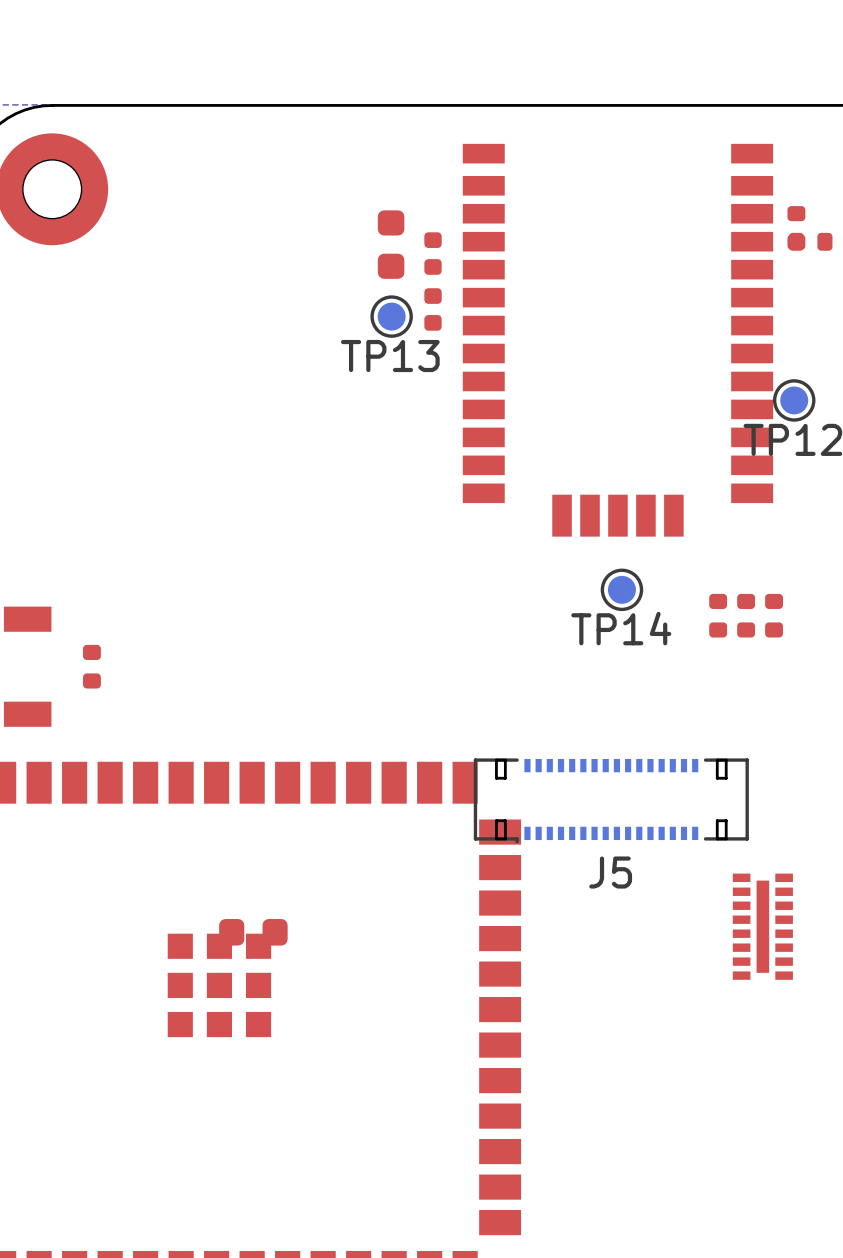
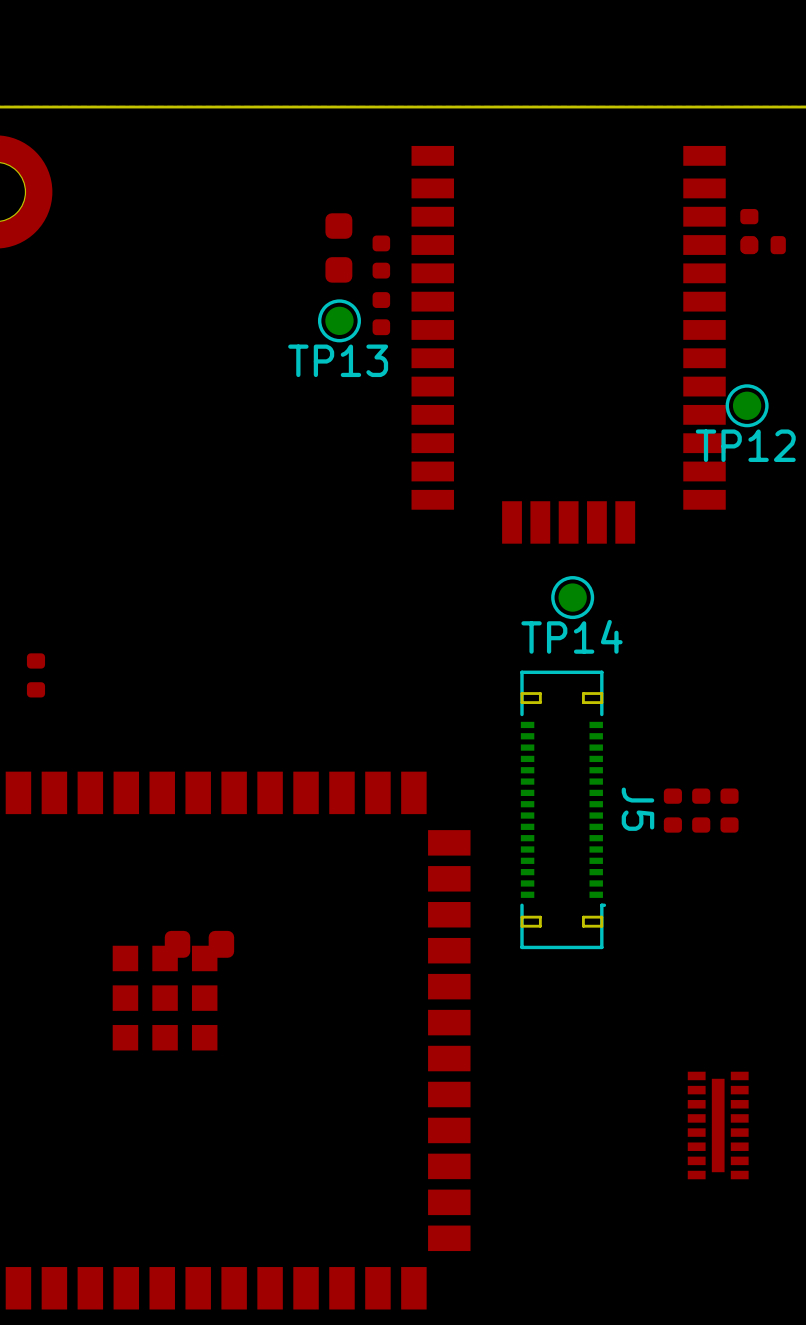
part: (718, 615) -> none
part: (746, 615) -> none
part: (774, 615) -> none
J5 rotation: 0° (611, 800) -> 90° counterclockwise (563, 809)
part: none -> (672, 810)
part: none -> (701, 810)
part: none -> (729, 810)
part position: (762, 926) -> (718, 1125)

